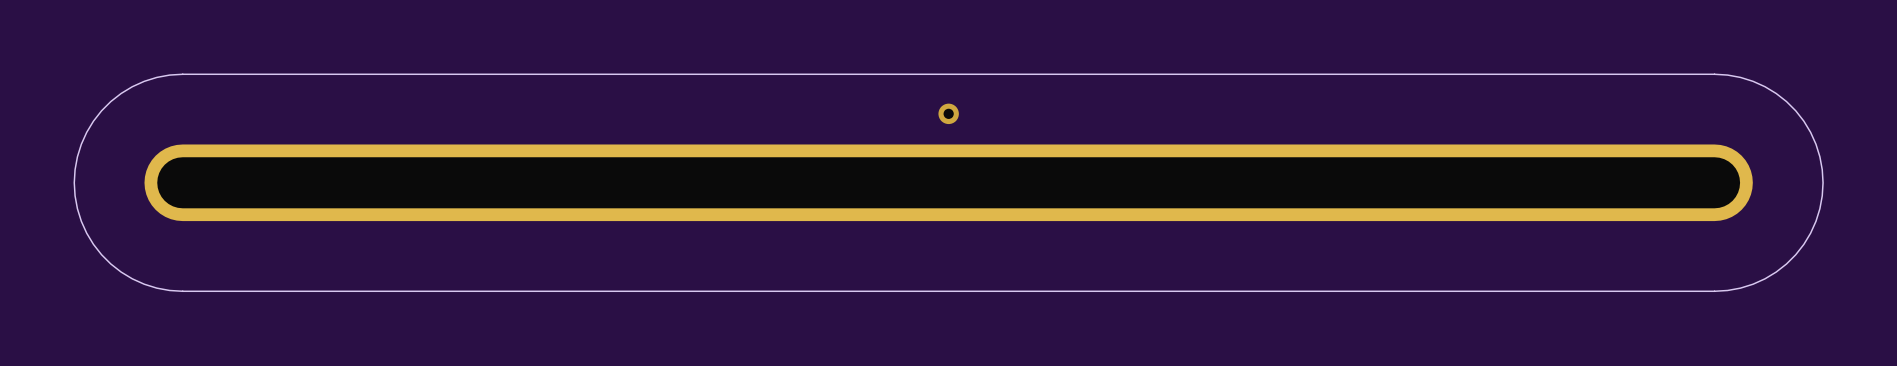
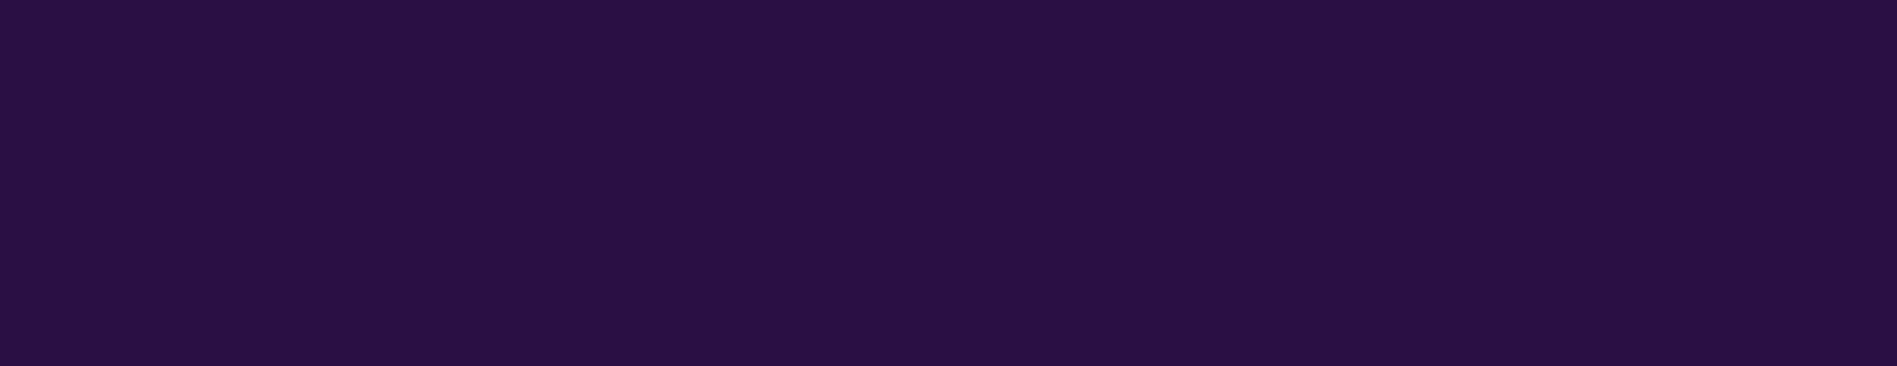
board edge: (182, 74) (1727, 75) (1740, 77) (1764, 86) (1776, 93) (1795, 110) (1810, 132) (1819, 156) (1822, 169) (1822, 195) (1815, 221) (1810, 233) (1795, 254) (1786, 263) (1764, 278) (1753, 284) (1727, 290) (1714, 291) (169, 290) (144, 284) (132, 278) (110, 263) (101, 254) (86, 233) (81, 221) (75, 195) (74, 182) (77, 156) (86, 132) (101, 110) (110, 101) (132, 86) (144, 81) (169, 75) (182, 74) -> none
via: (948, 113) -> none
part: (948, 182) -> none

